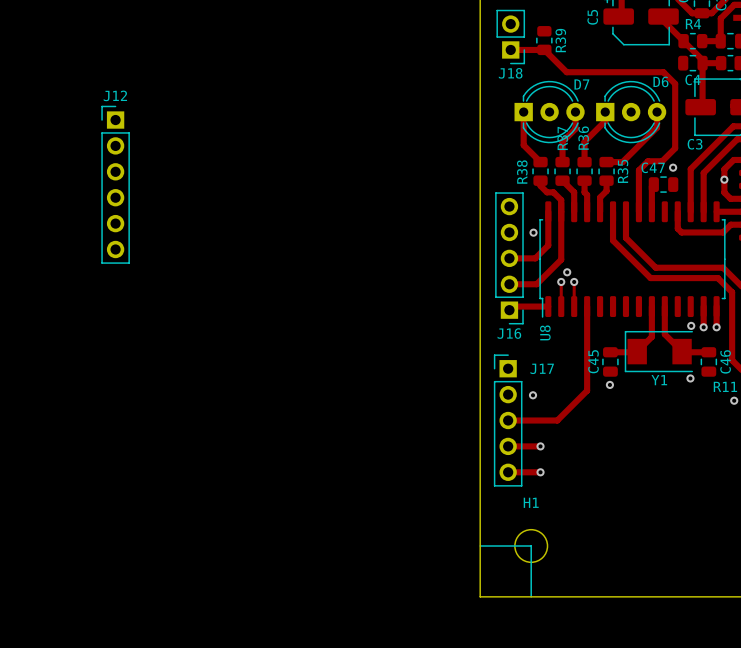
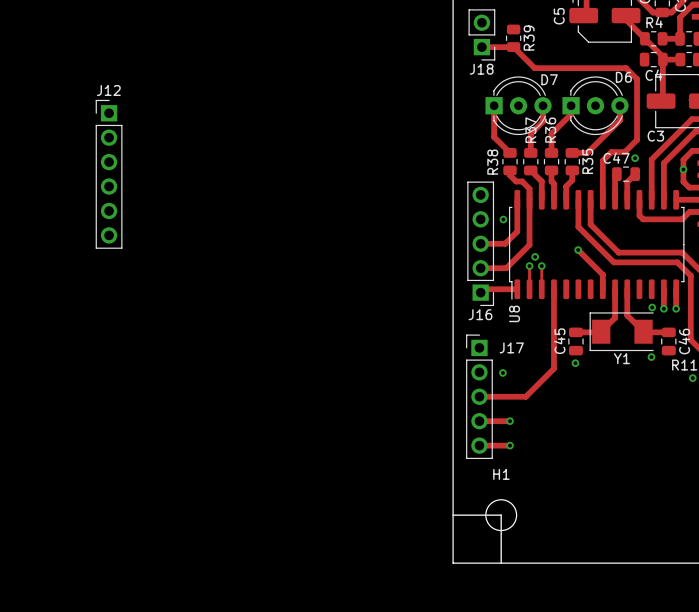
track: none -> (635, 174) (627, 182) (627, 199)
track: none -> (578, 250) (602, 274) (602, 289)
via: none -> (578, 250)

